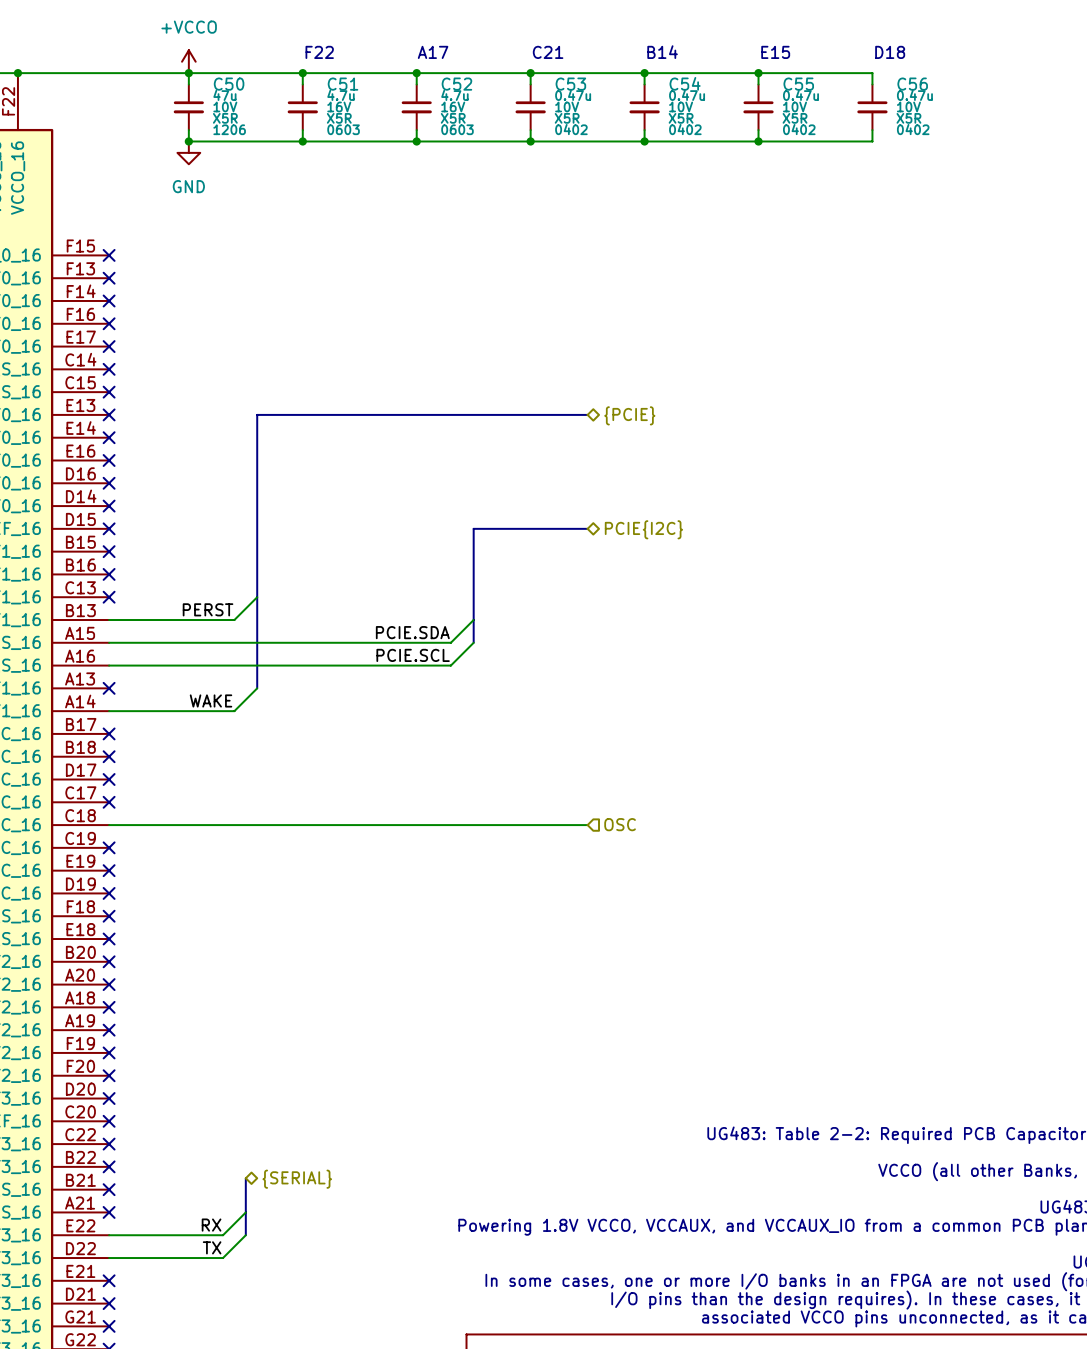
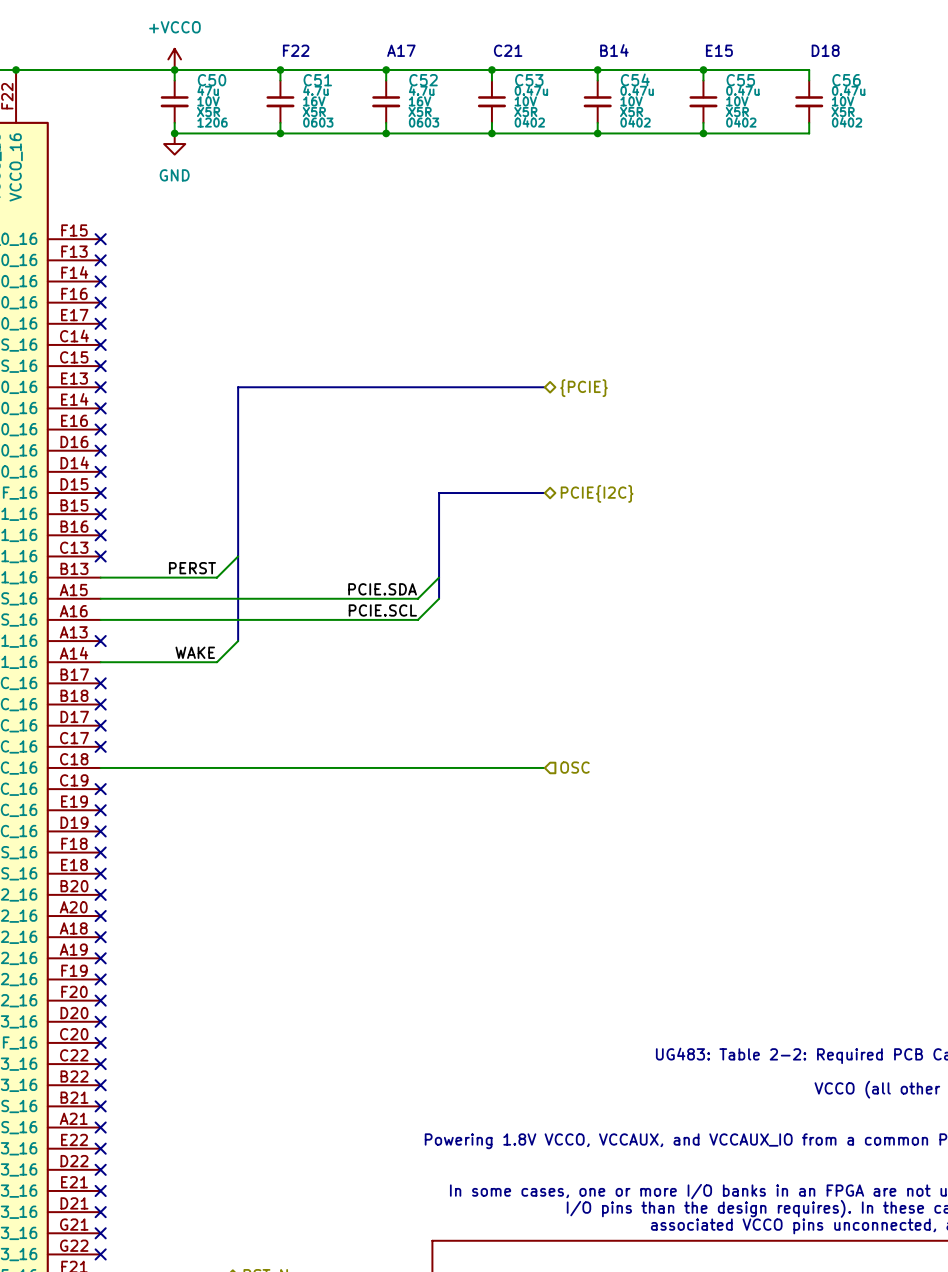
bus: (245, 1178) (245, 1235) -> none
hierarchical label: {SERIAL} (297, 1179) -> none
wire: (245, 1212) (223, 1235) (109, 1235) -> none
label: RX (211, 1225) -> none
no-connect mark: none -> (100, 1148)
wire: (245, 1235) (223, 1258) (109, 1258) -> none
label: TX (212, 1247) -> none
no-connect mark: none -> (100, 1169)

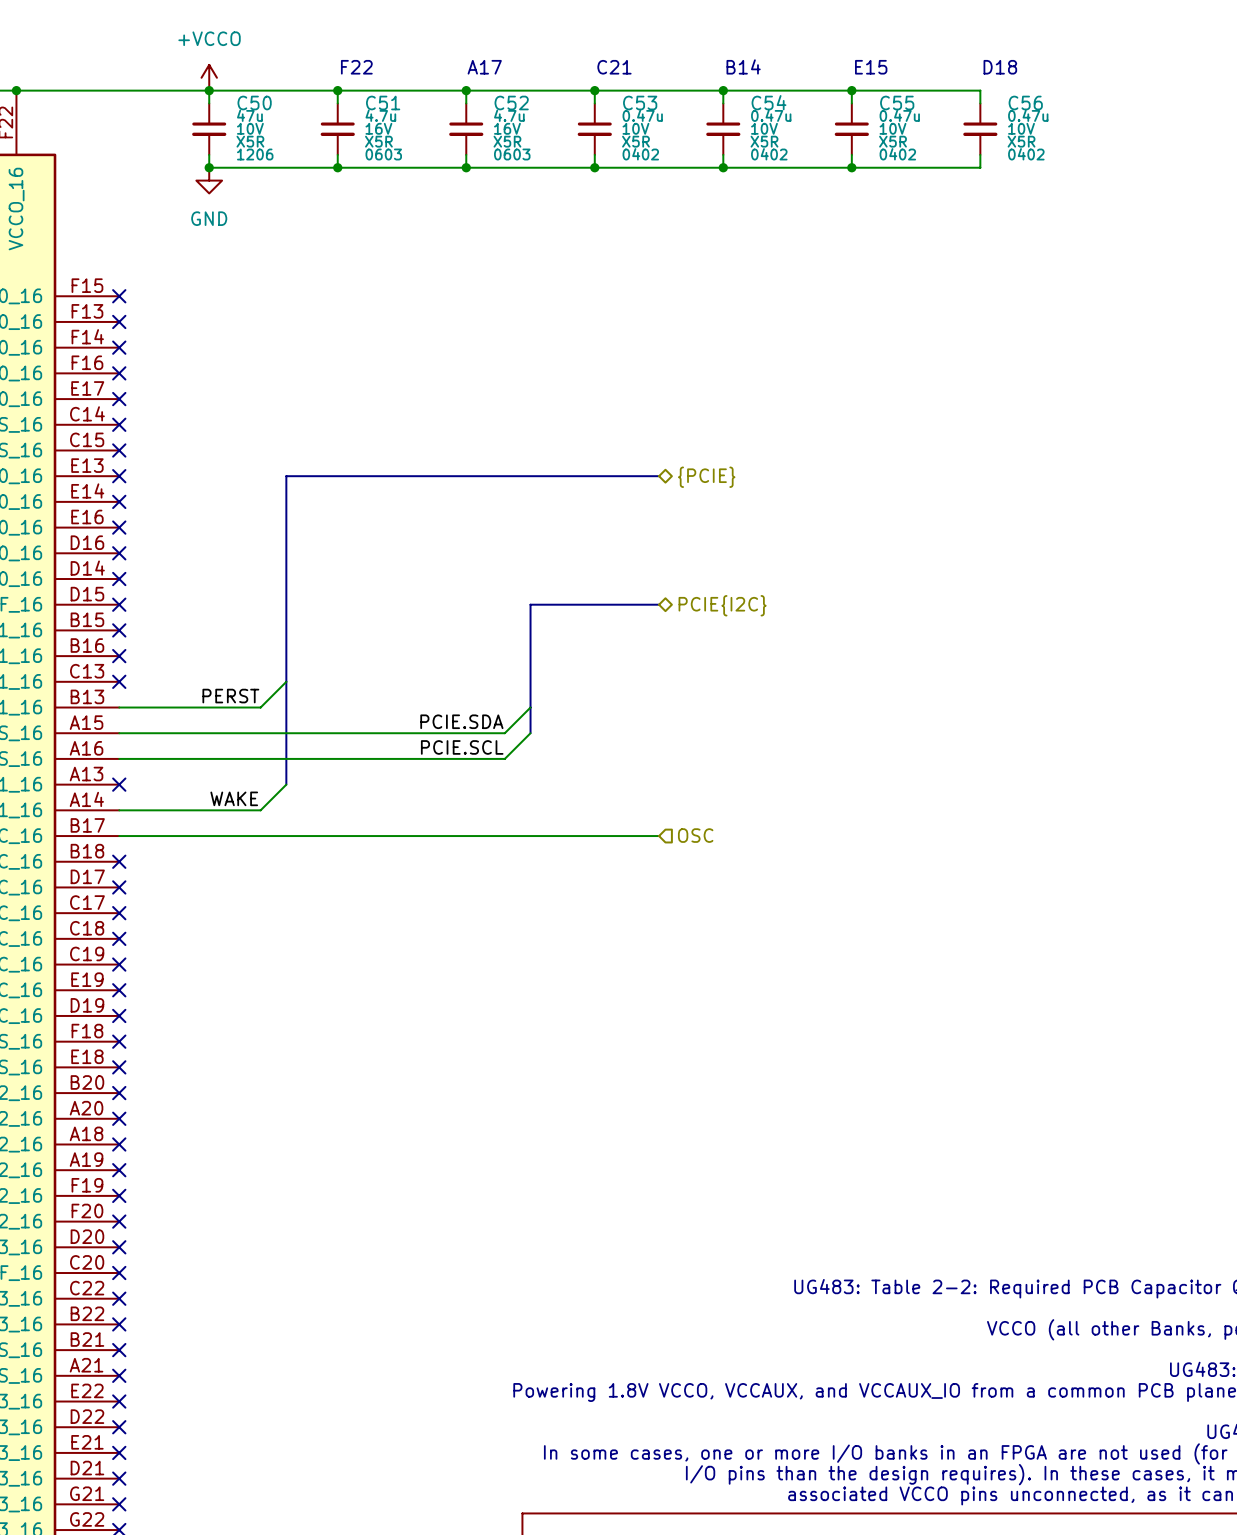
no-connect mark: (100, 683) -> none
wire: (100, 767) (544, 767) -> (119, 836) (659, 836)
no-connect mark: none -> (119, 938)
hierarchical label position: OSC (574, 767) -> OSC (695, 835)

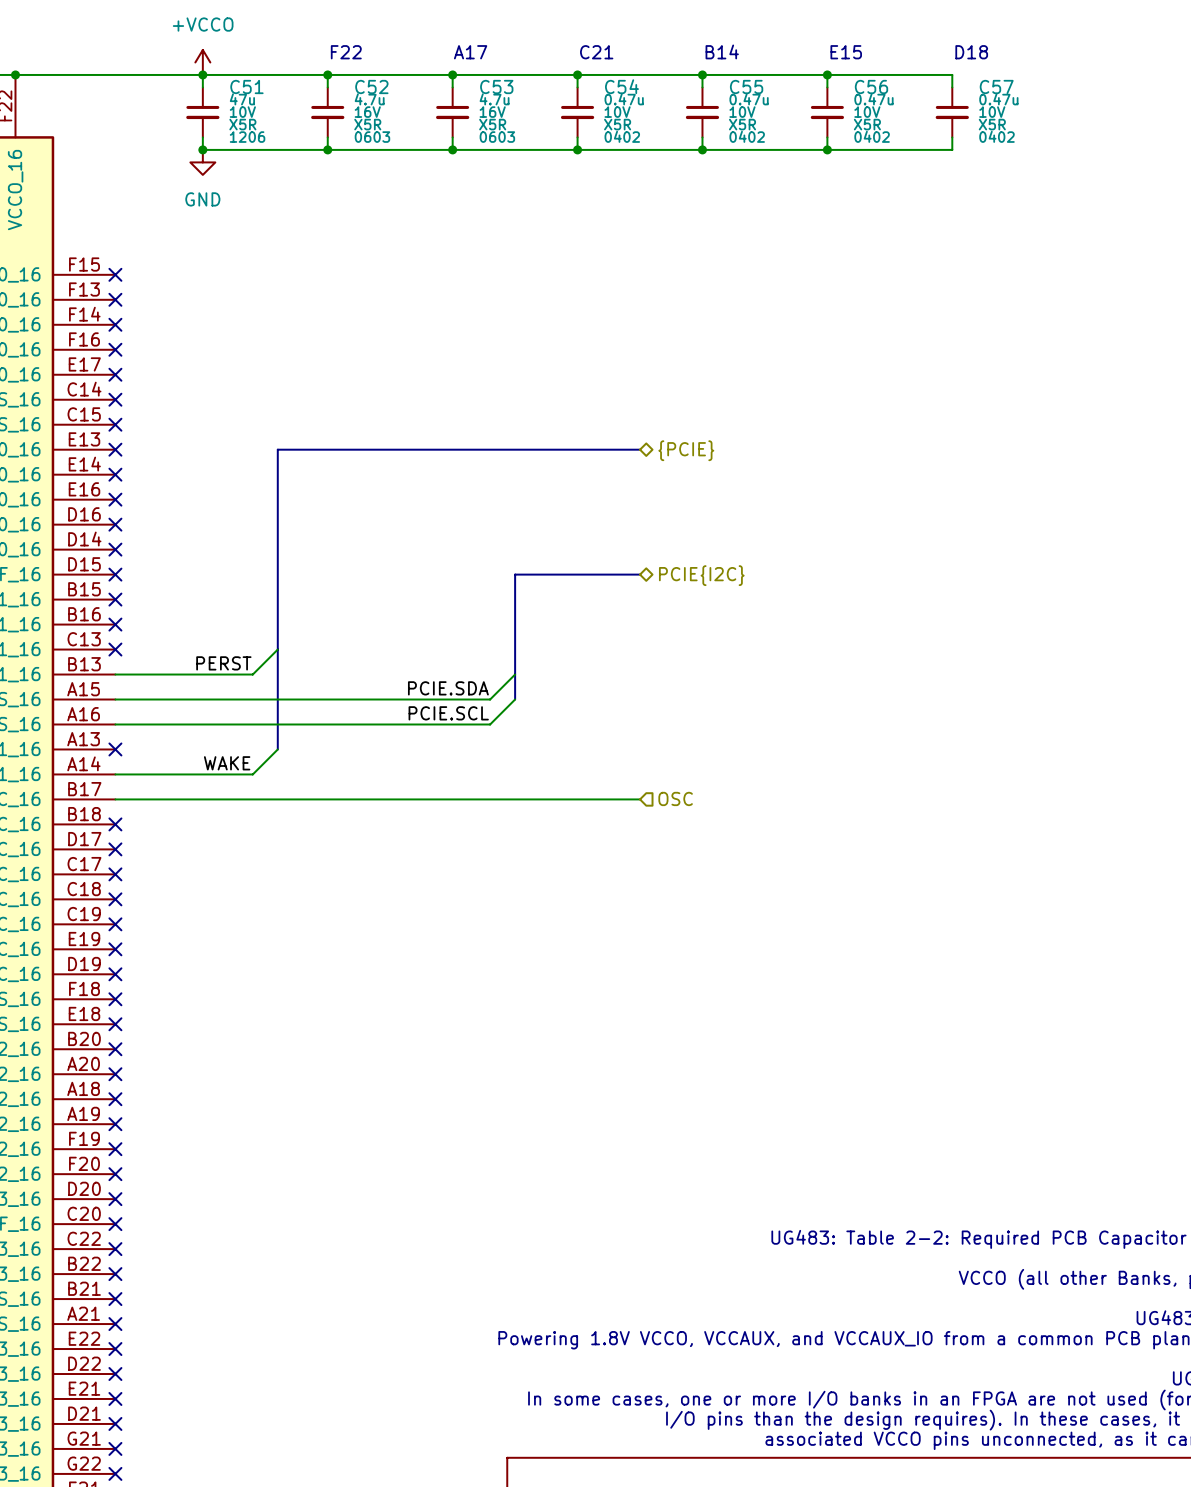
C54 name: C54 (769, 102) -> C55 (746, 86)
C50 name: C50 (254, 103) -> C51 (246, 86)
C51 name: C51 (383, 103) -> C52 (371, 86)
C52 name: C52 (511, 103) -> C53 (496, 86)
C53 name: C53 (640, 103) -> C54 (621, 86)
C55 name: C55 (897, 103) -> C56 (871, 86)
C56 name: C56 (1025, 103) -> C57 (996, 86)

